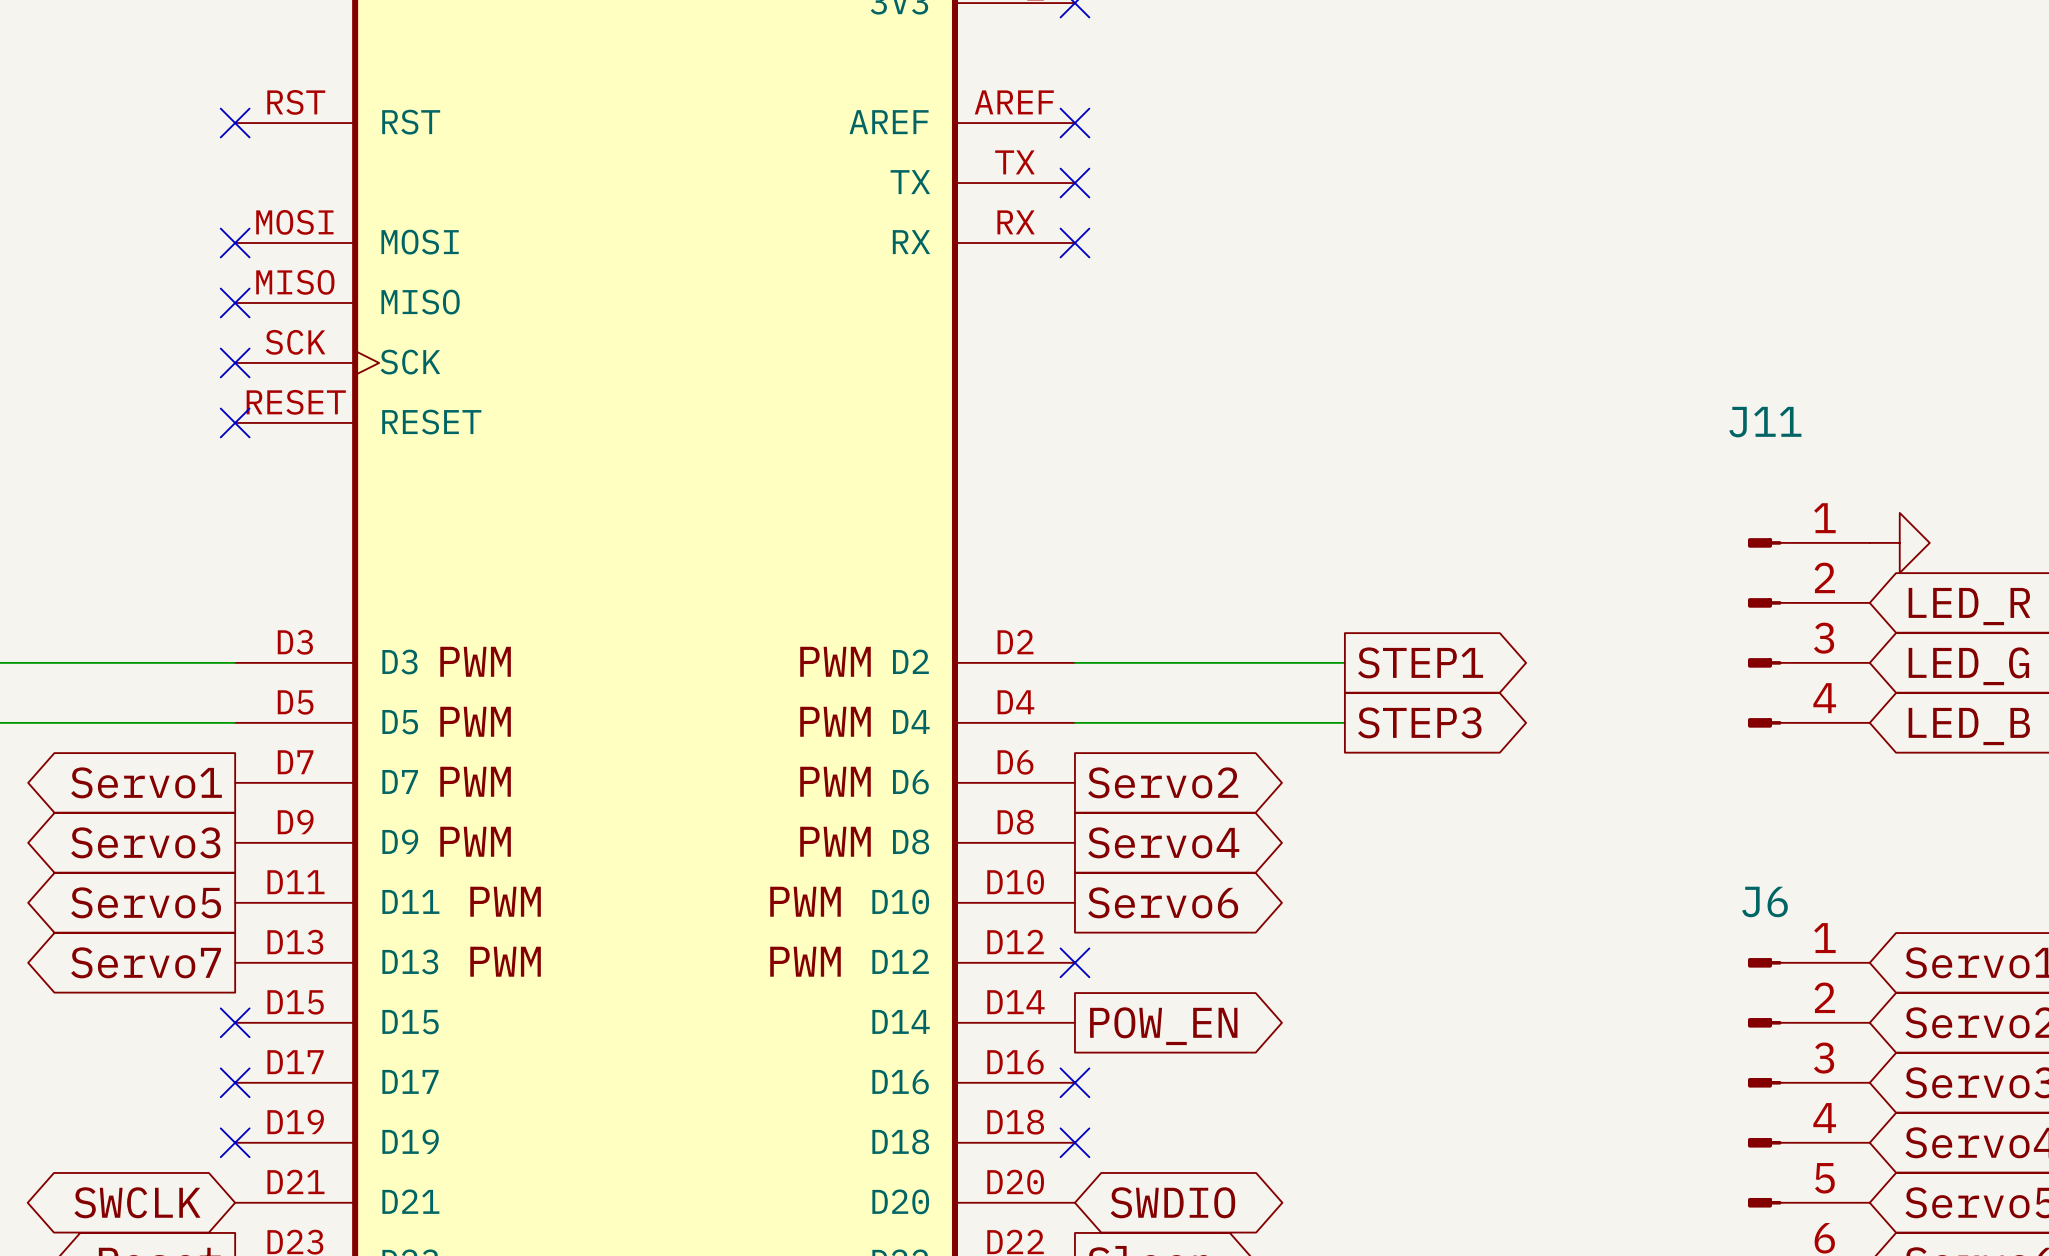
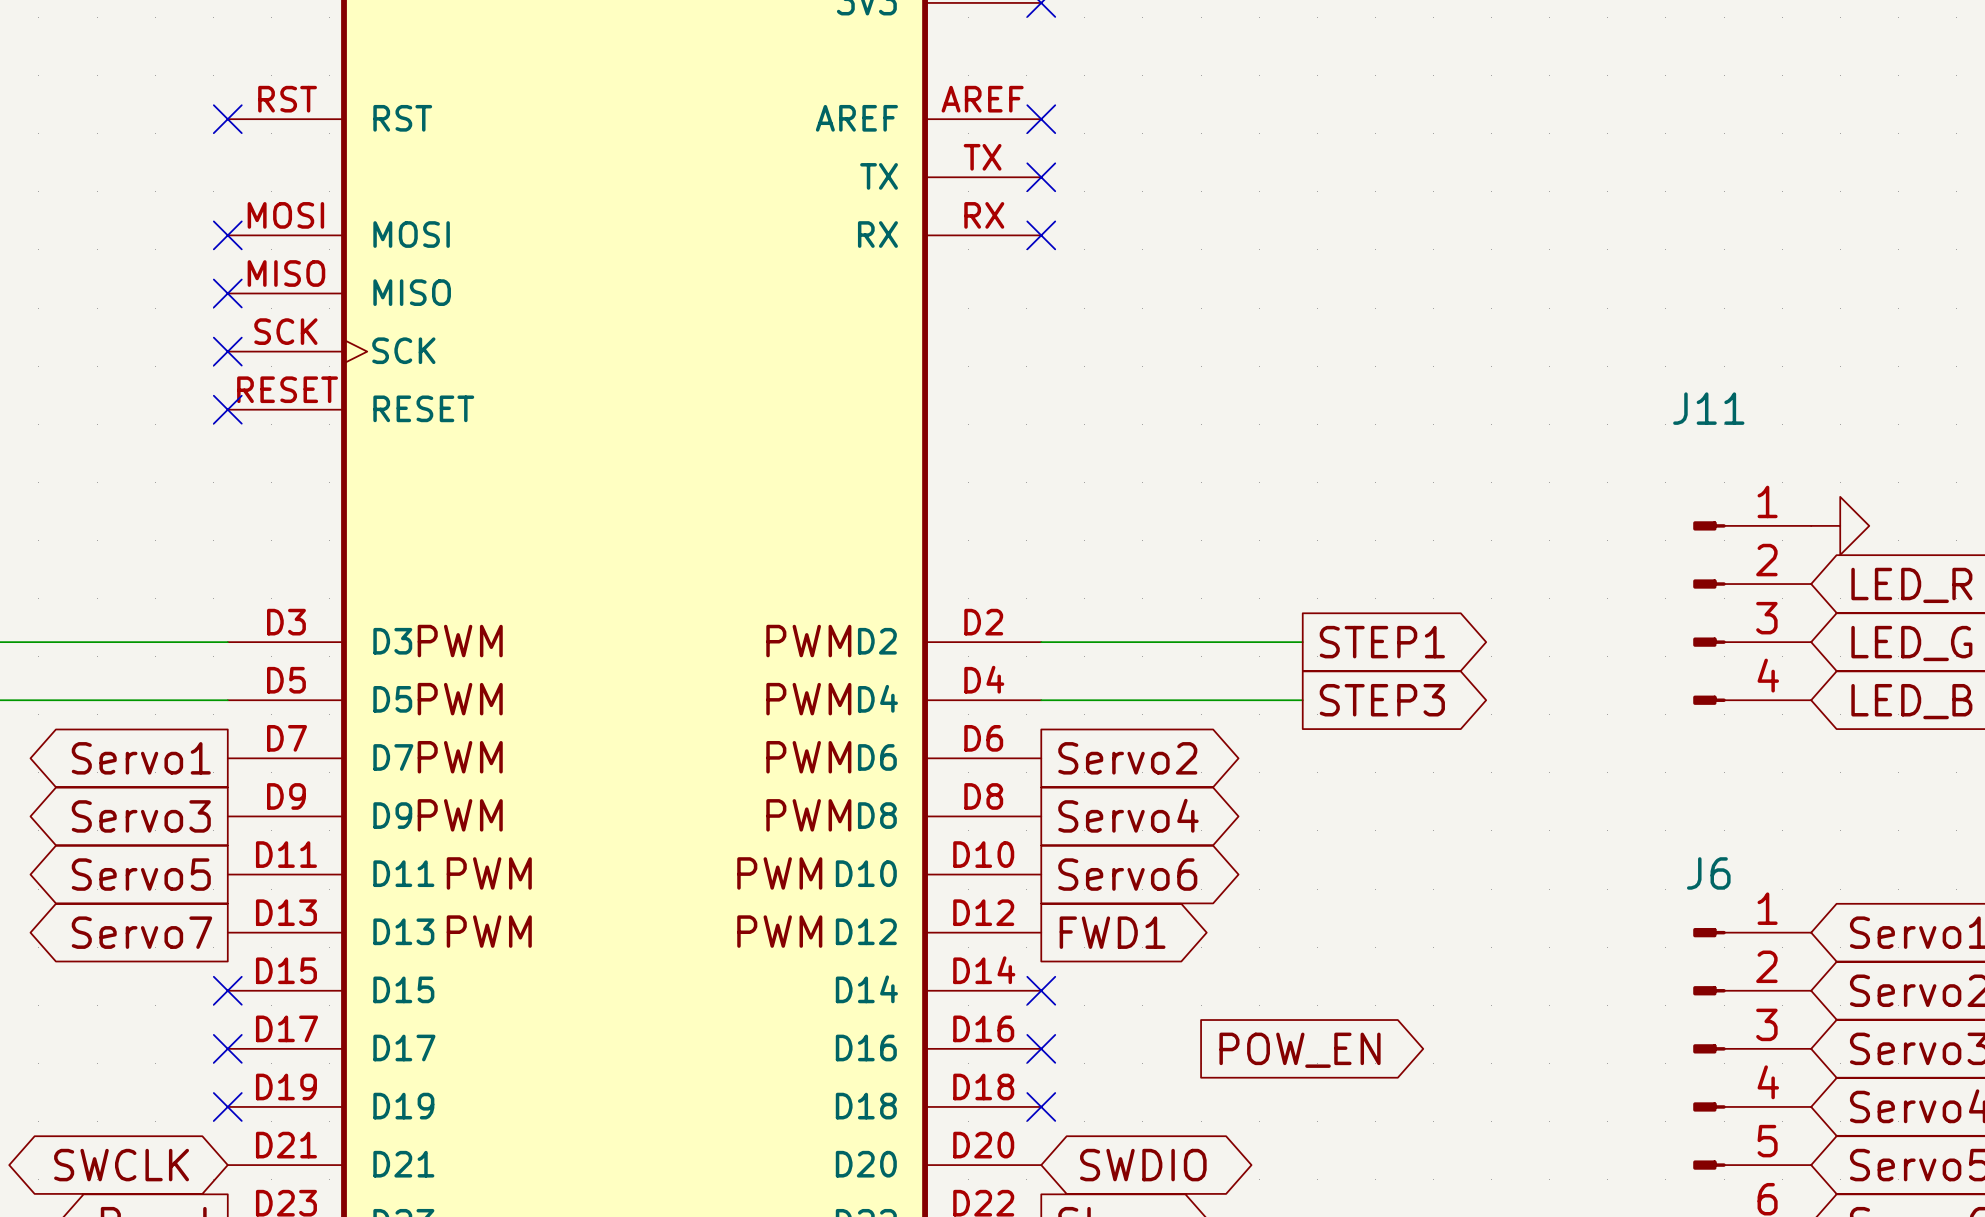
no-connect mark position: (1074, 962) -> (1041, 990)
global label: none -> FWD1 (1112, 932)
global label position: POW_EN (1163, 1026) -> POW_EN (1300, 1050)

